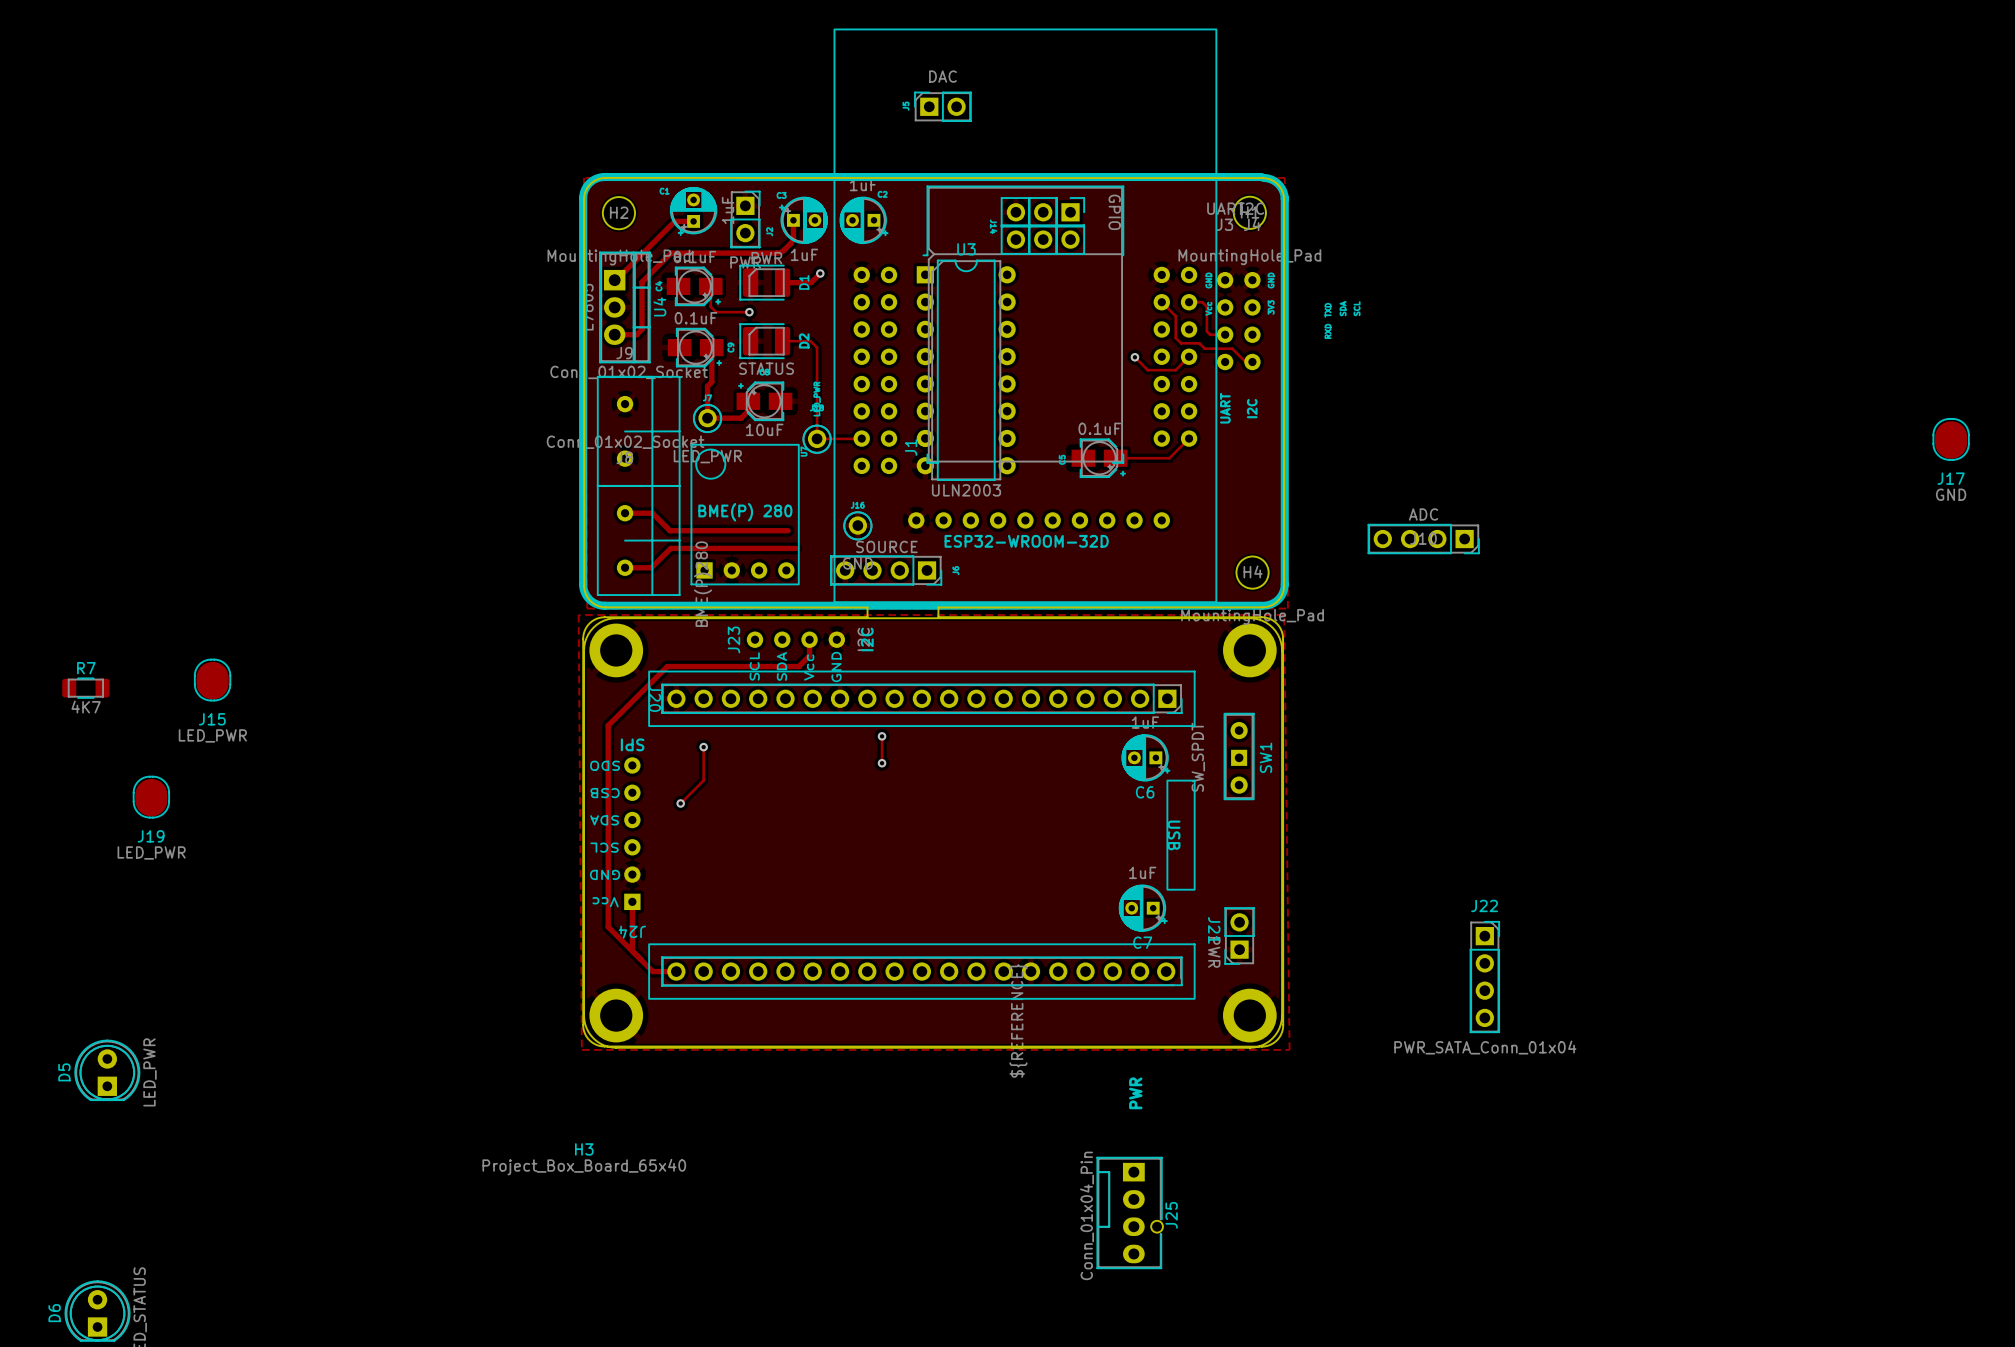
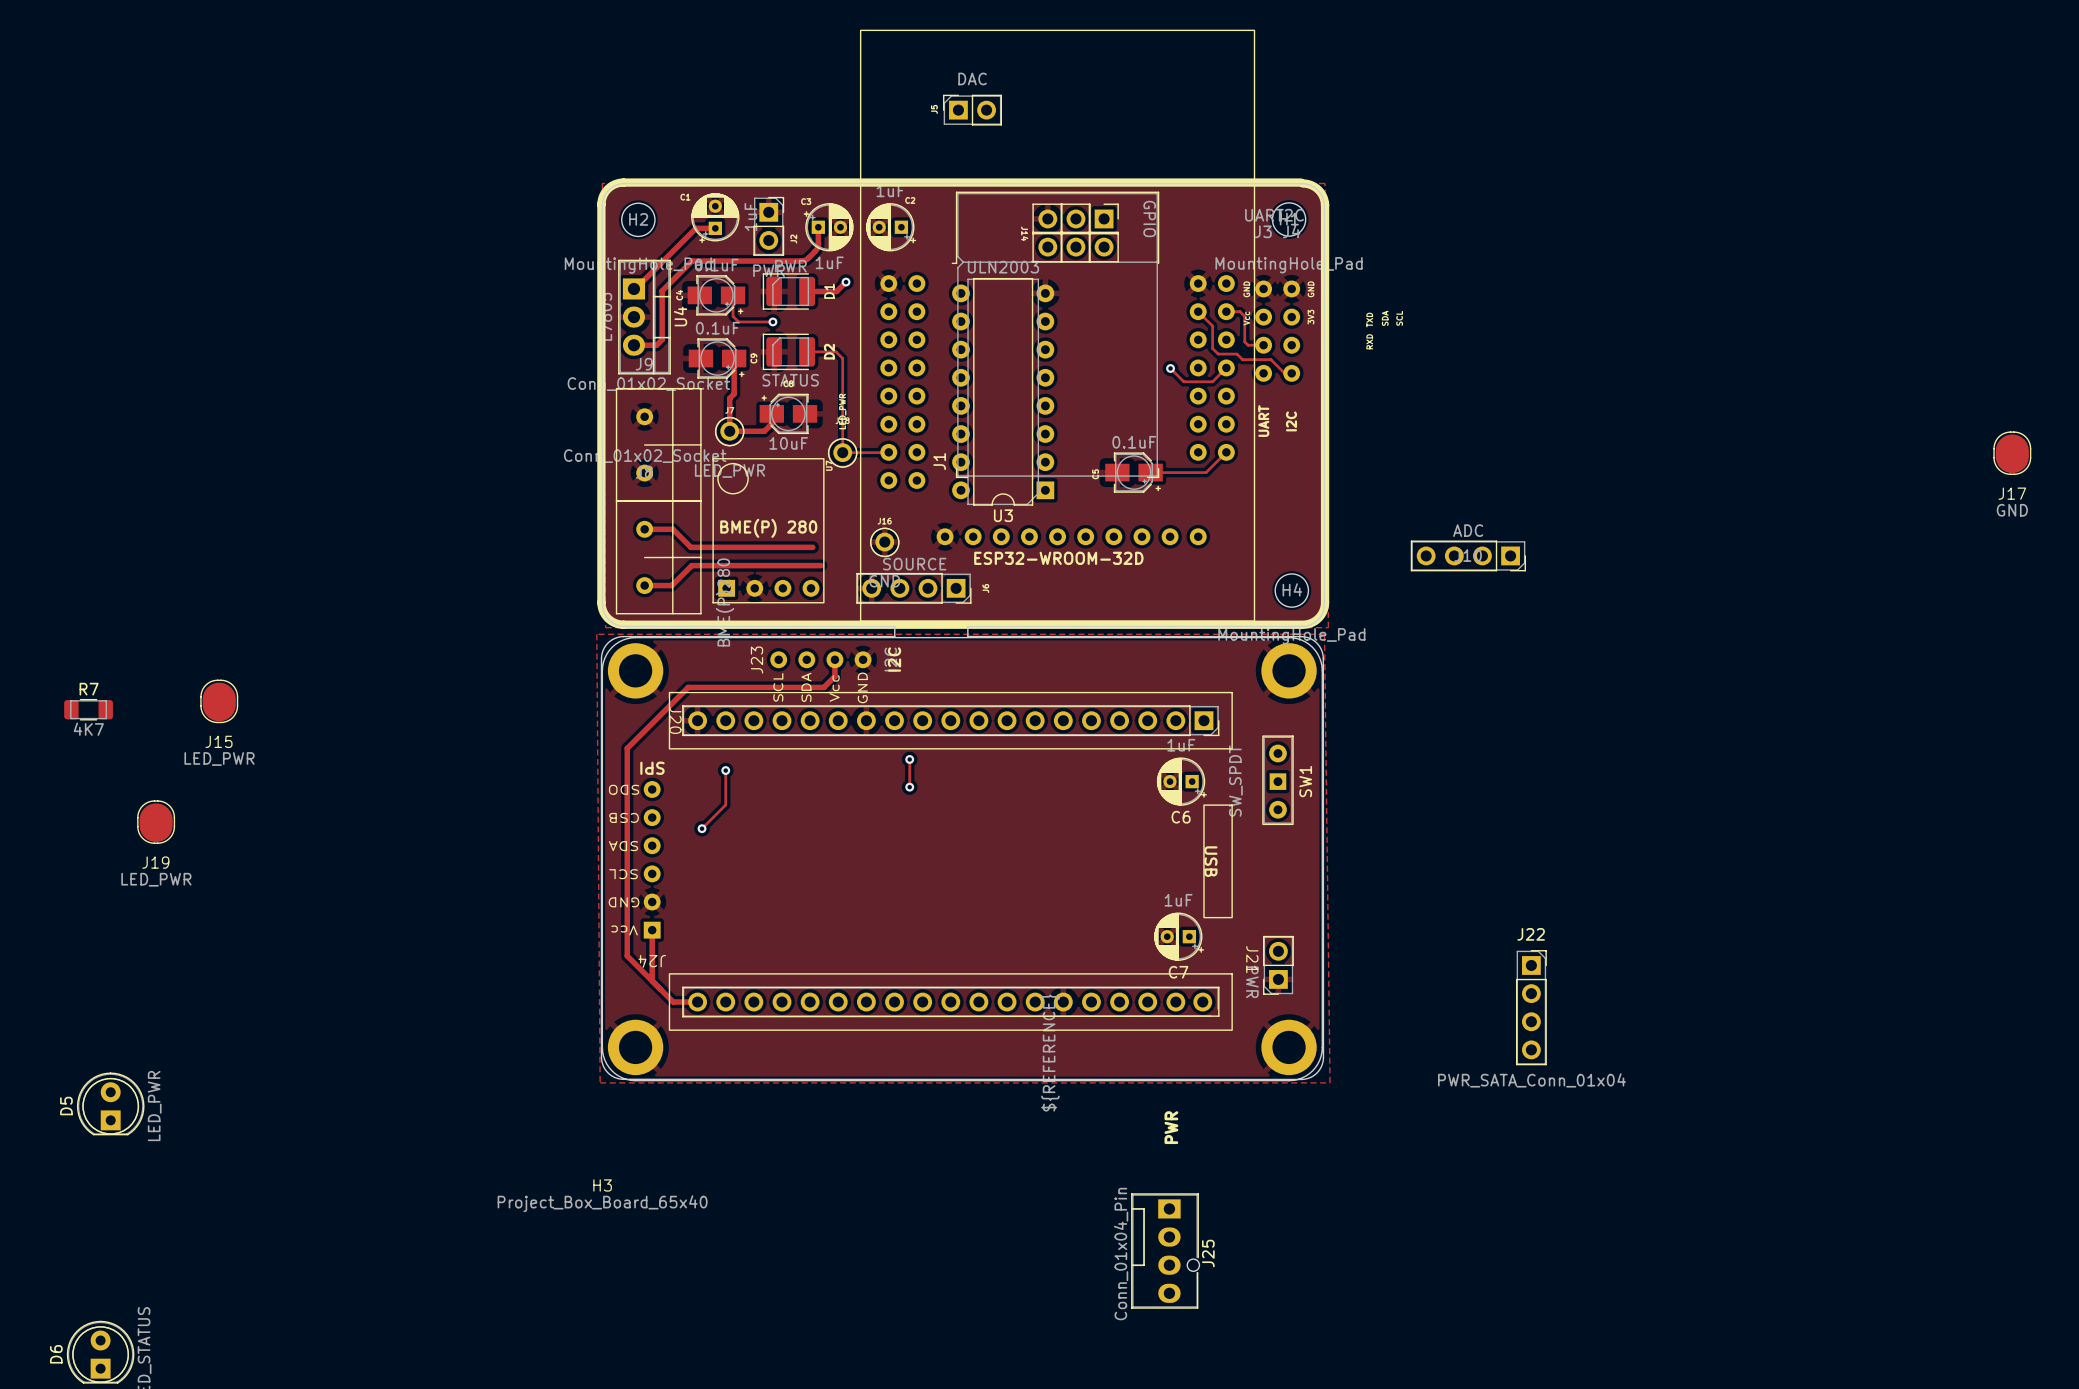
U3 rotation: 0° (966, 370) -> 180° (1003, 391)

